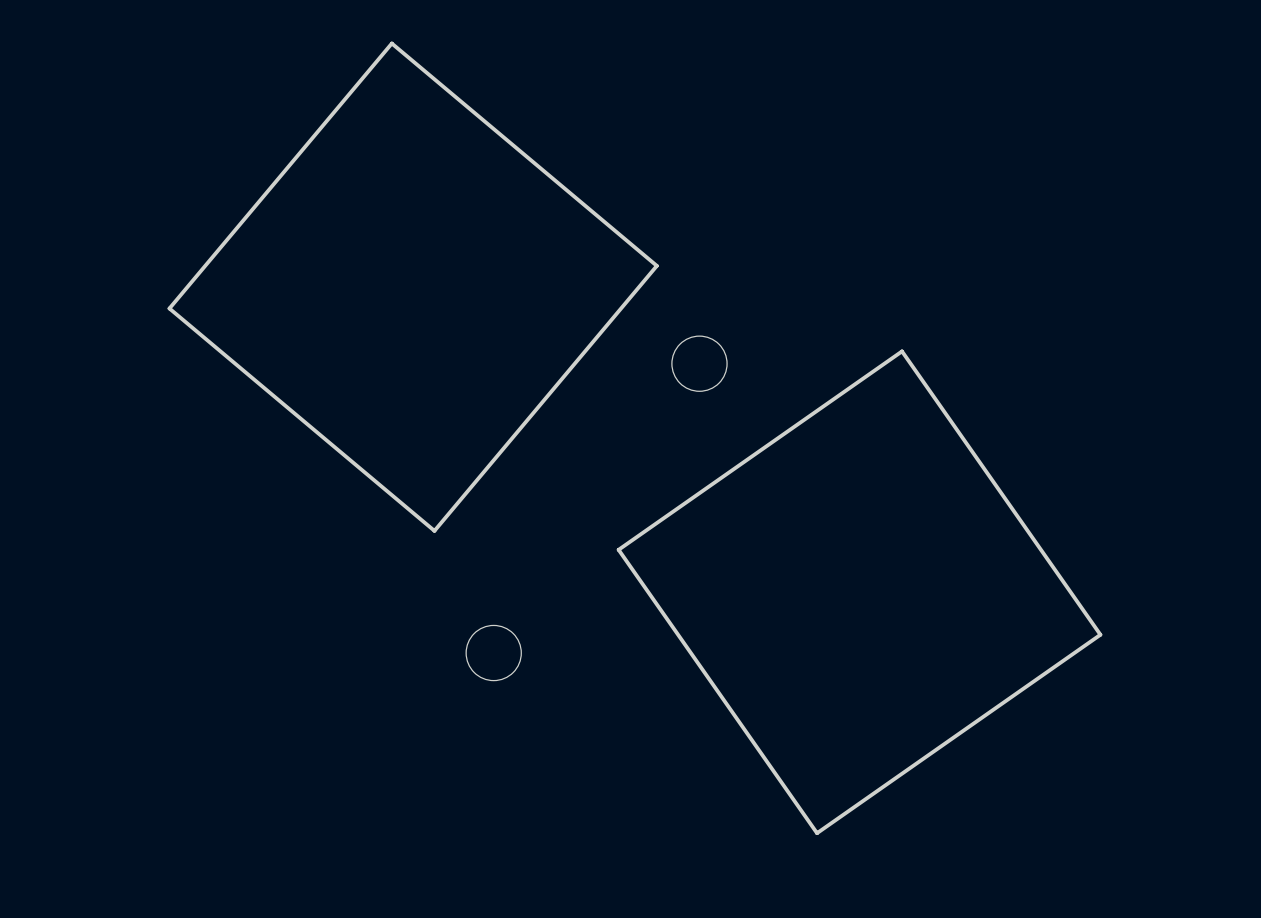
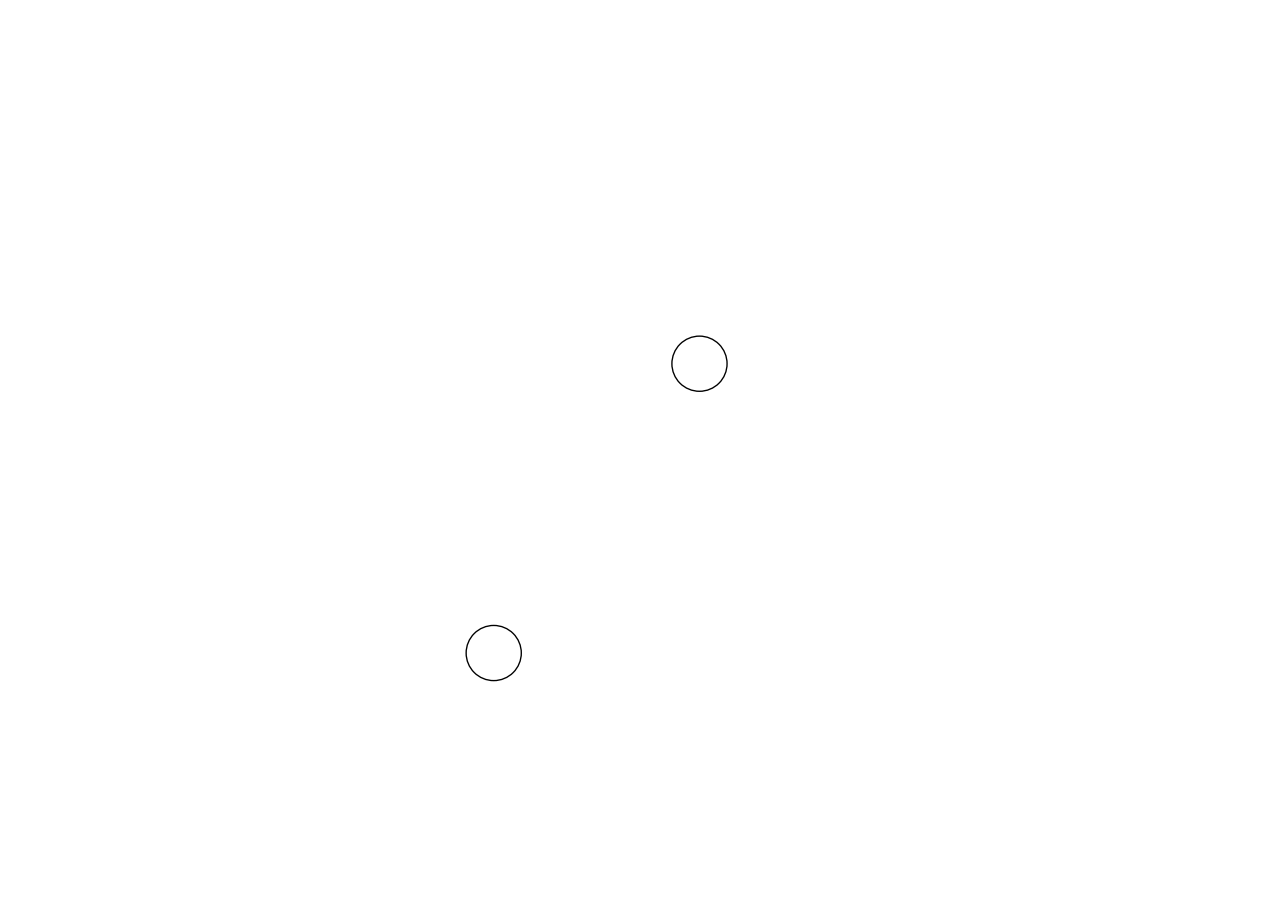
board edge: (391, 43) (656, 265) (434, 530) (169, 308) (391, 43) -> none
board edge: (902, 351) (1100, 634) (817, 833) (618, 549) (902, 351) -> none

